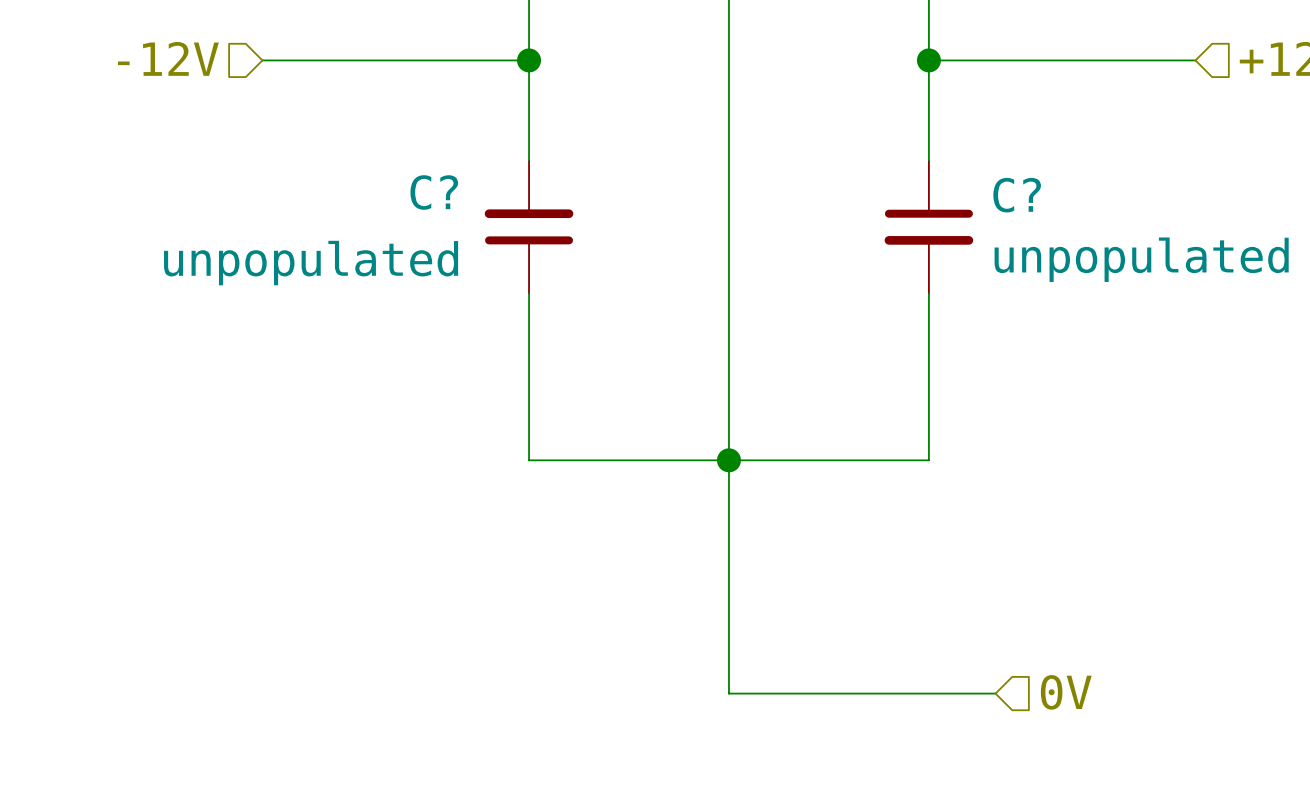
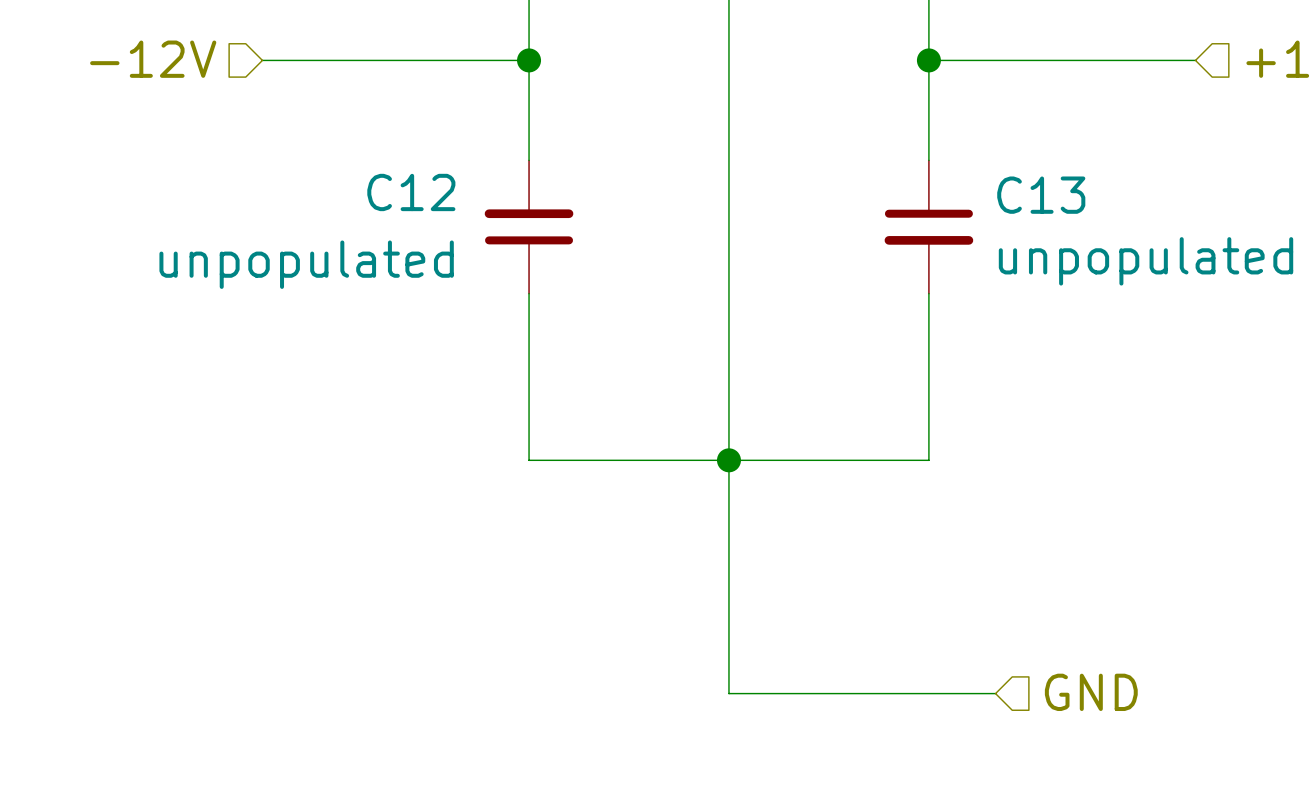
C? name: C? (434, 192) -> C12 (411, 192)
C? name: C? (1017, 195) -> C13 (1041, 195)
hierarchical label: 0V (1066, 692) -> GND (1091, 692)

